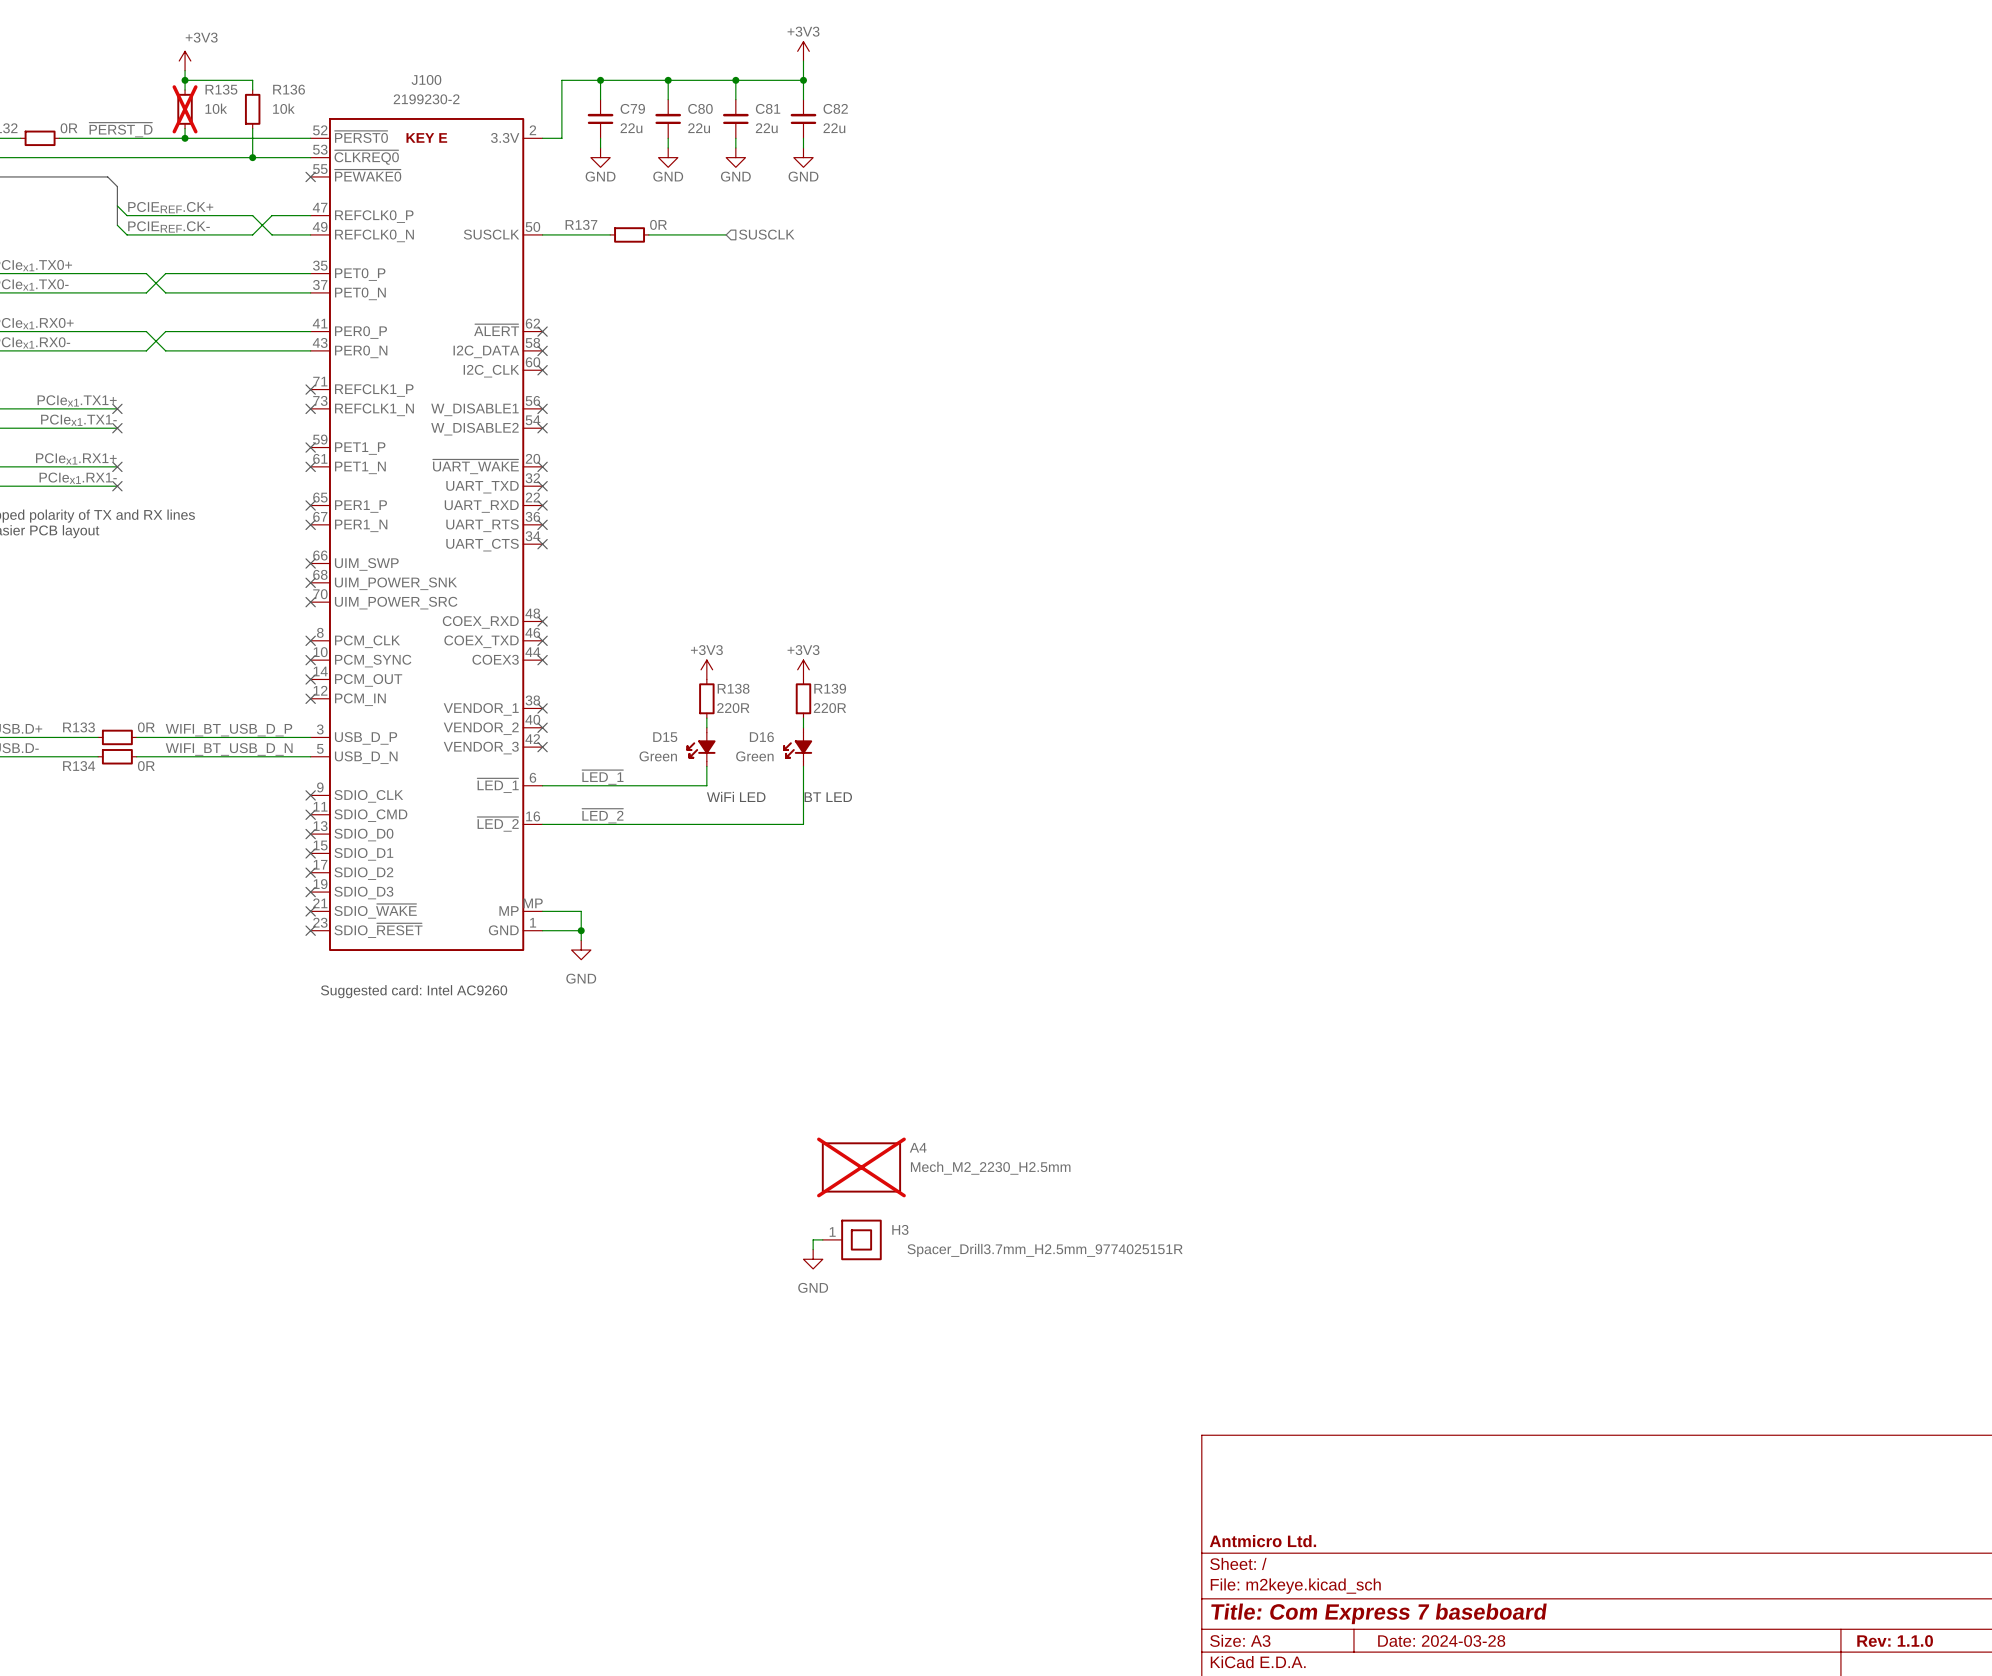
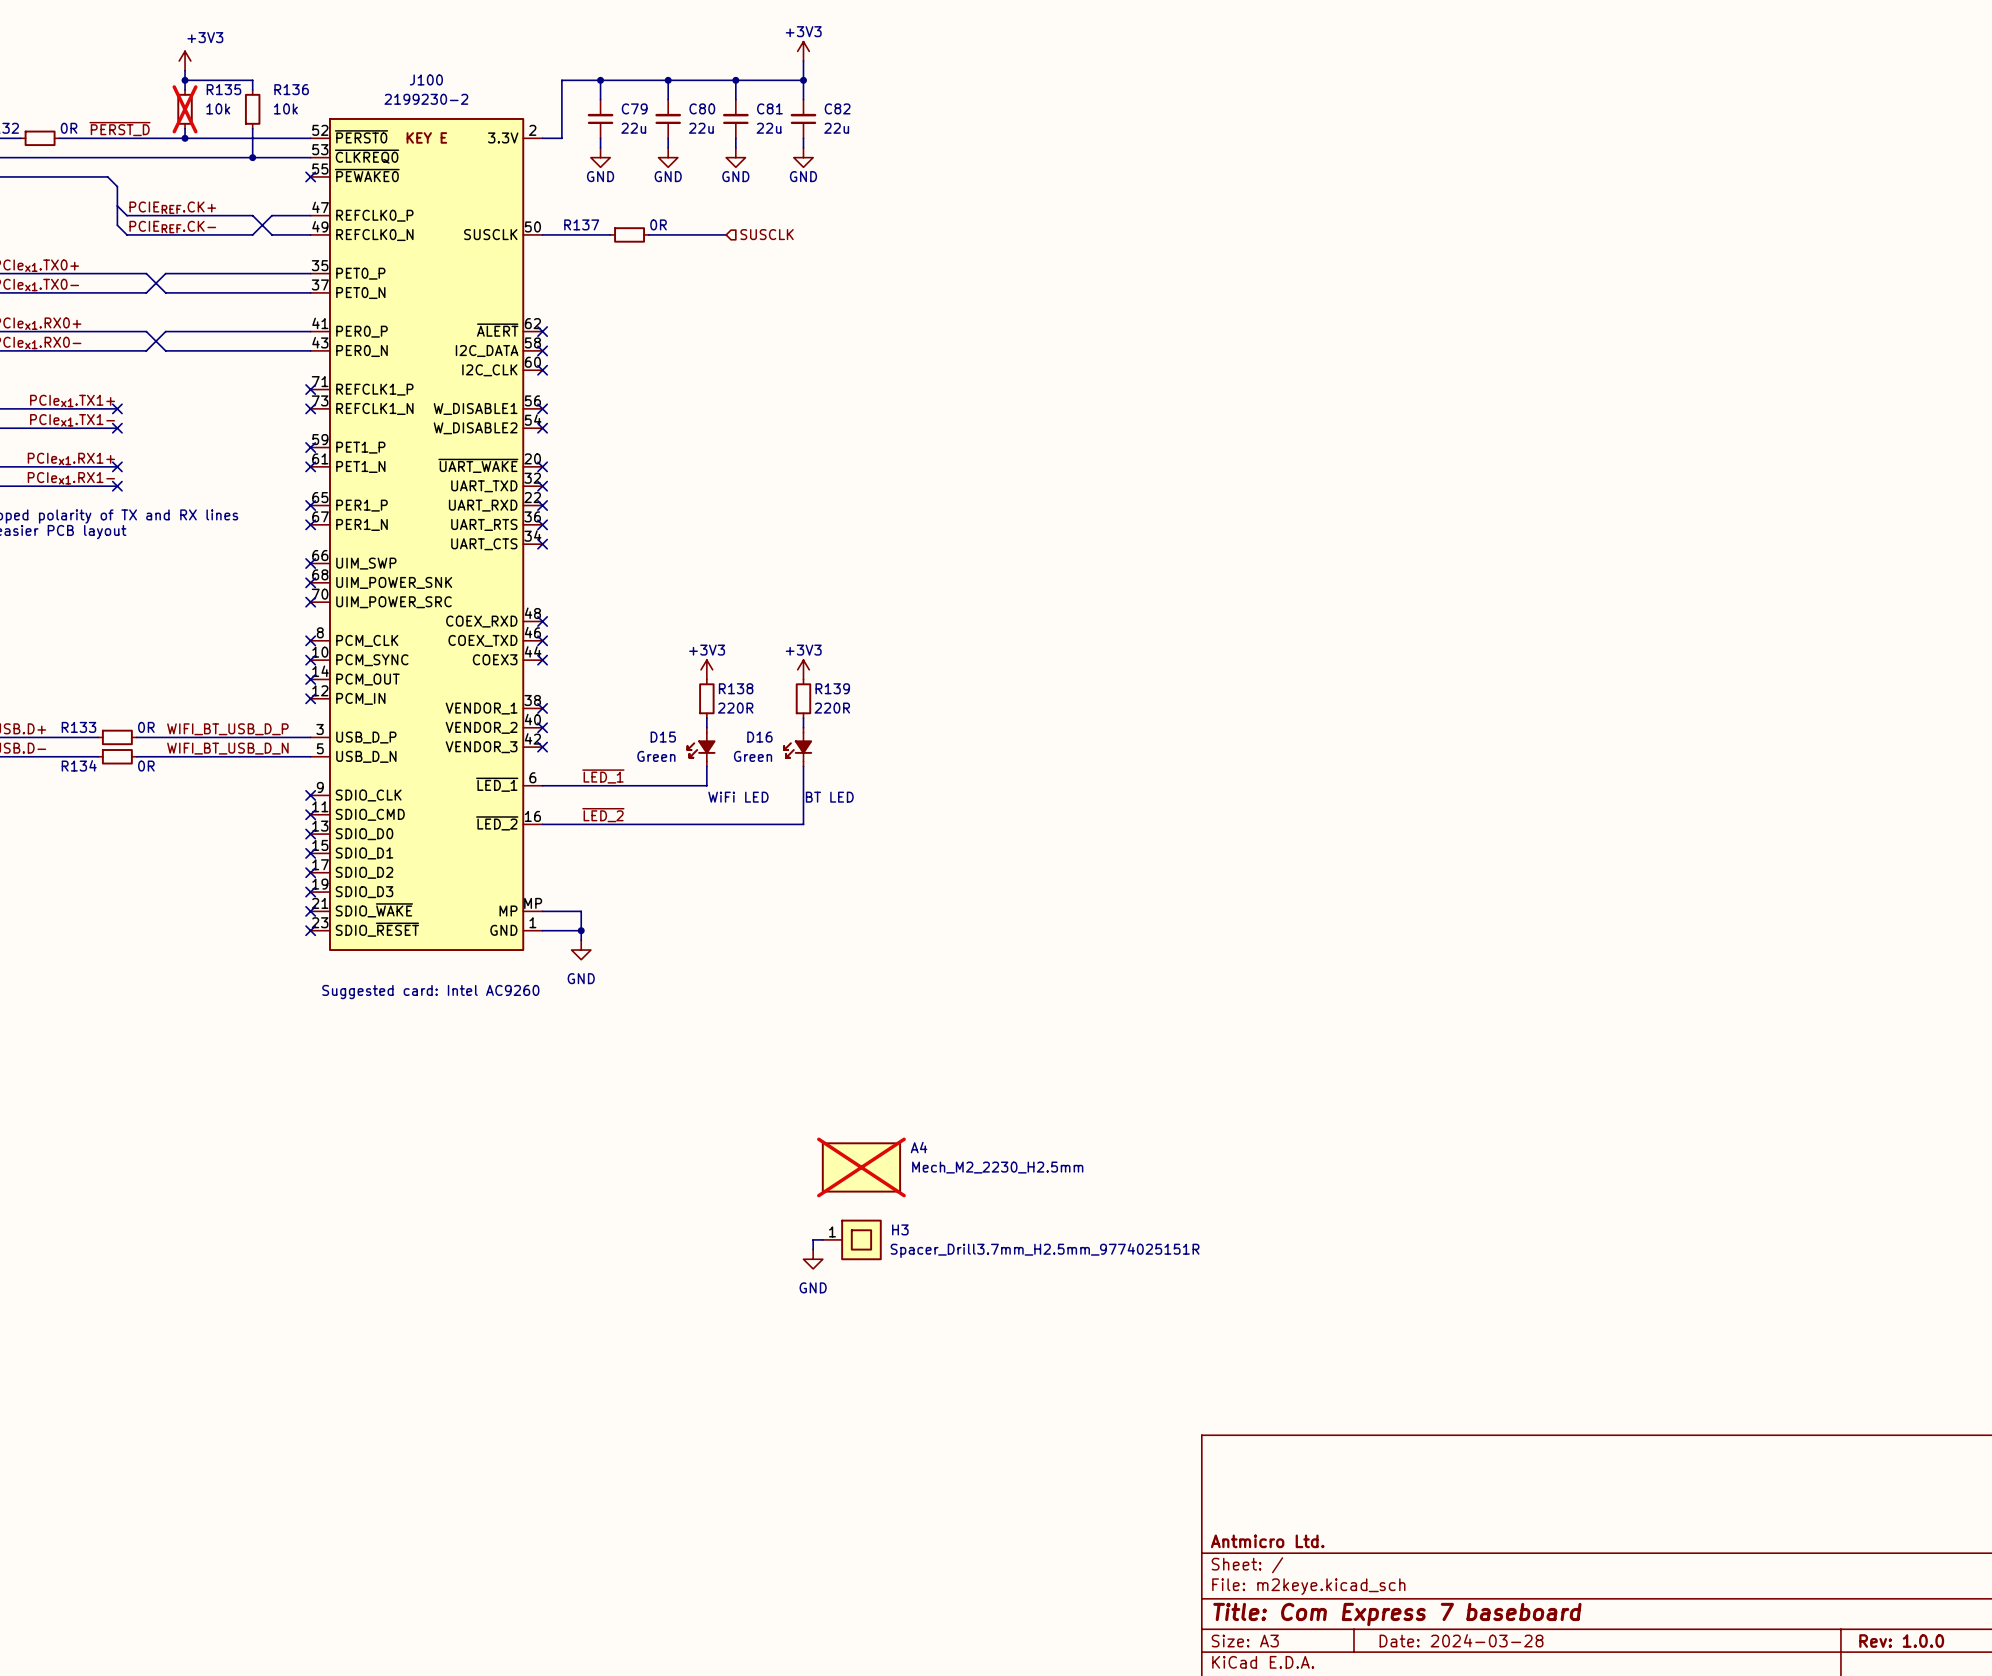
title block: Rev: 1.1.0 (1895, 1641) -> Rev: 1.0.0 (1901, 1641)

